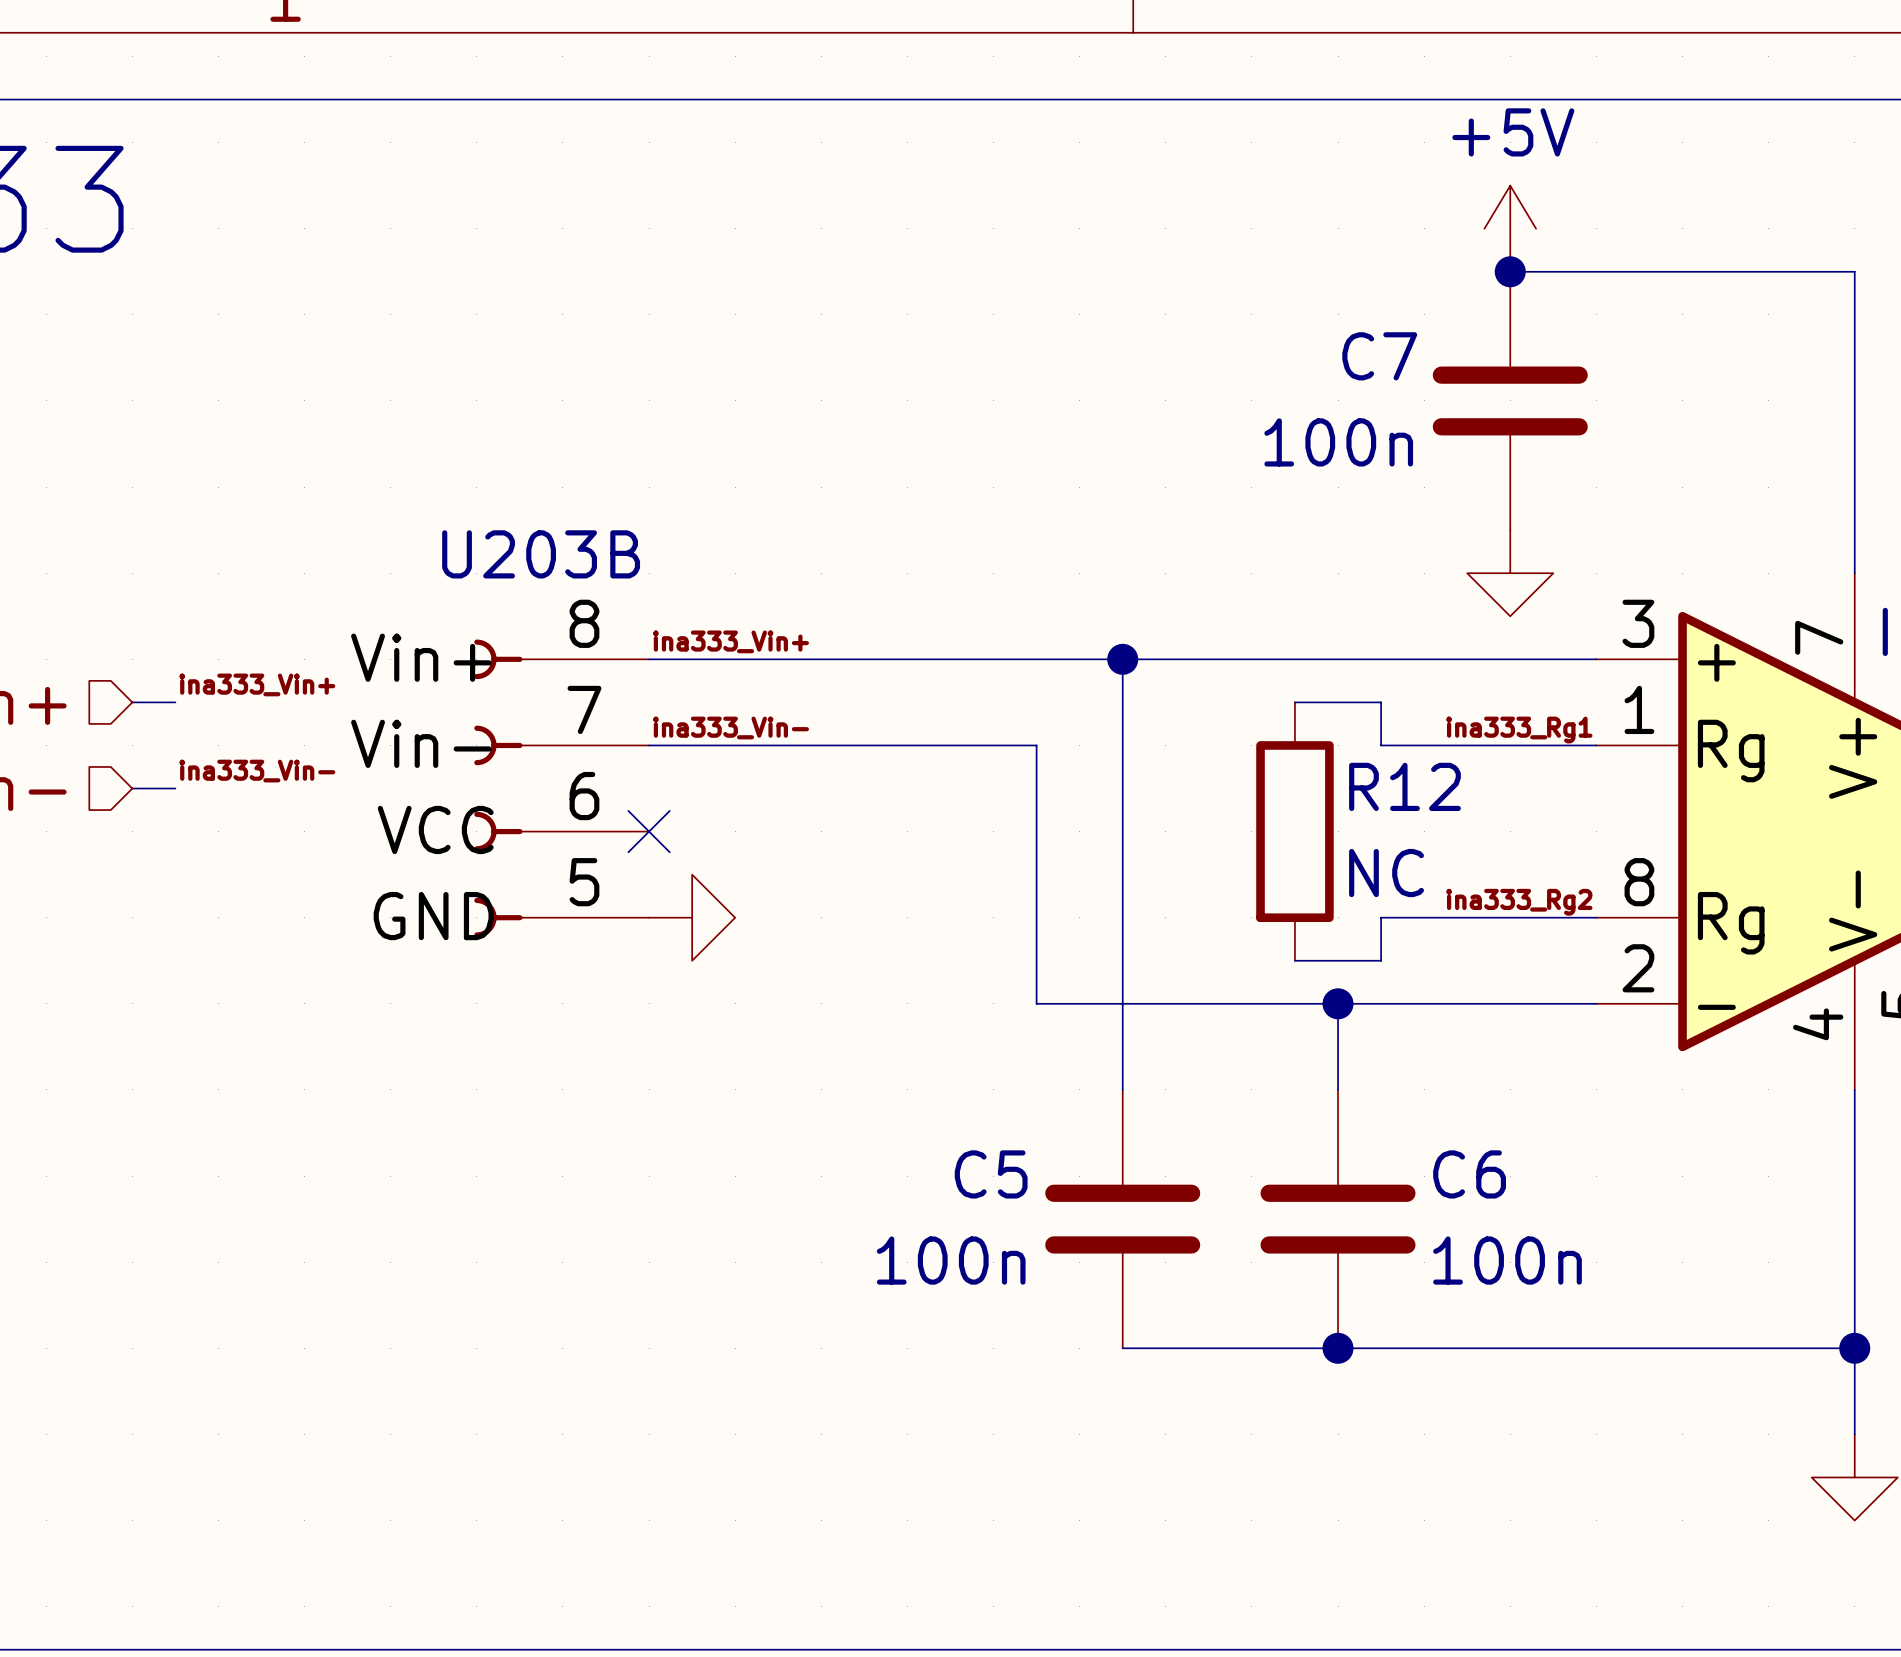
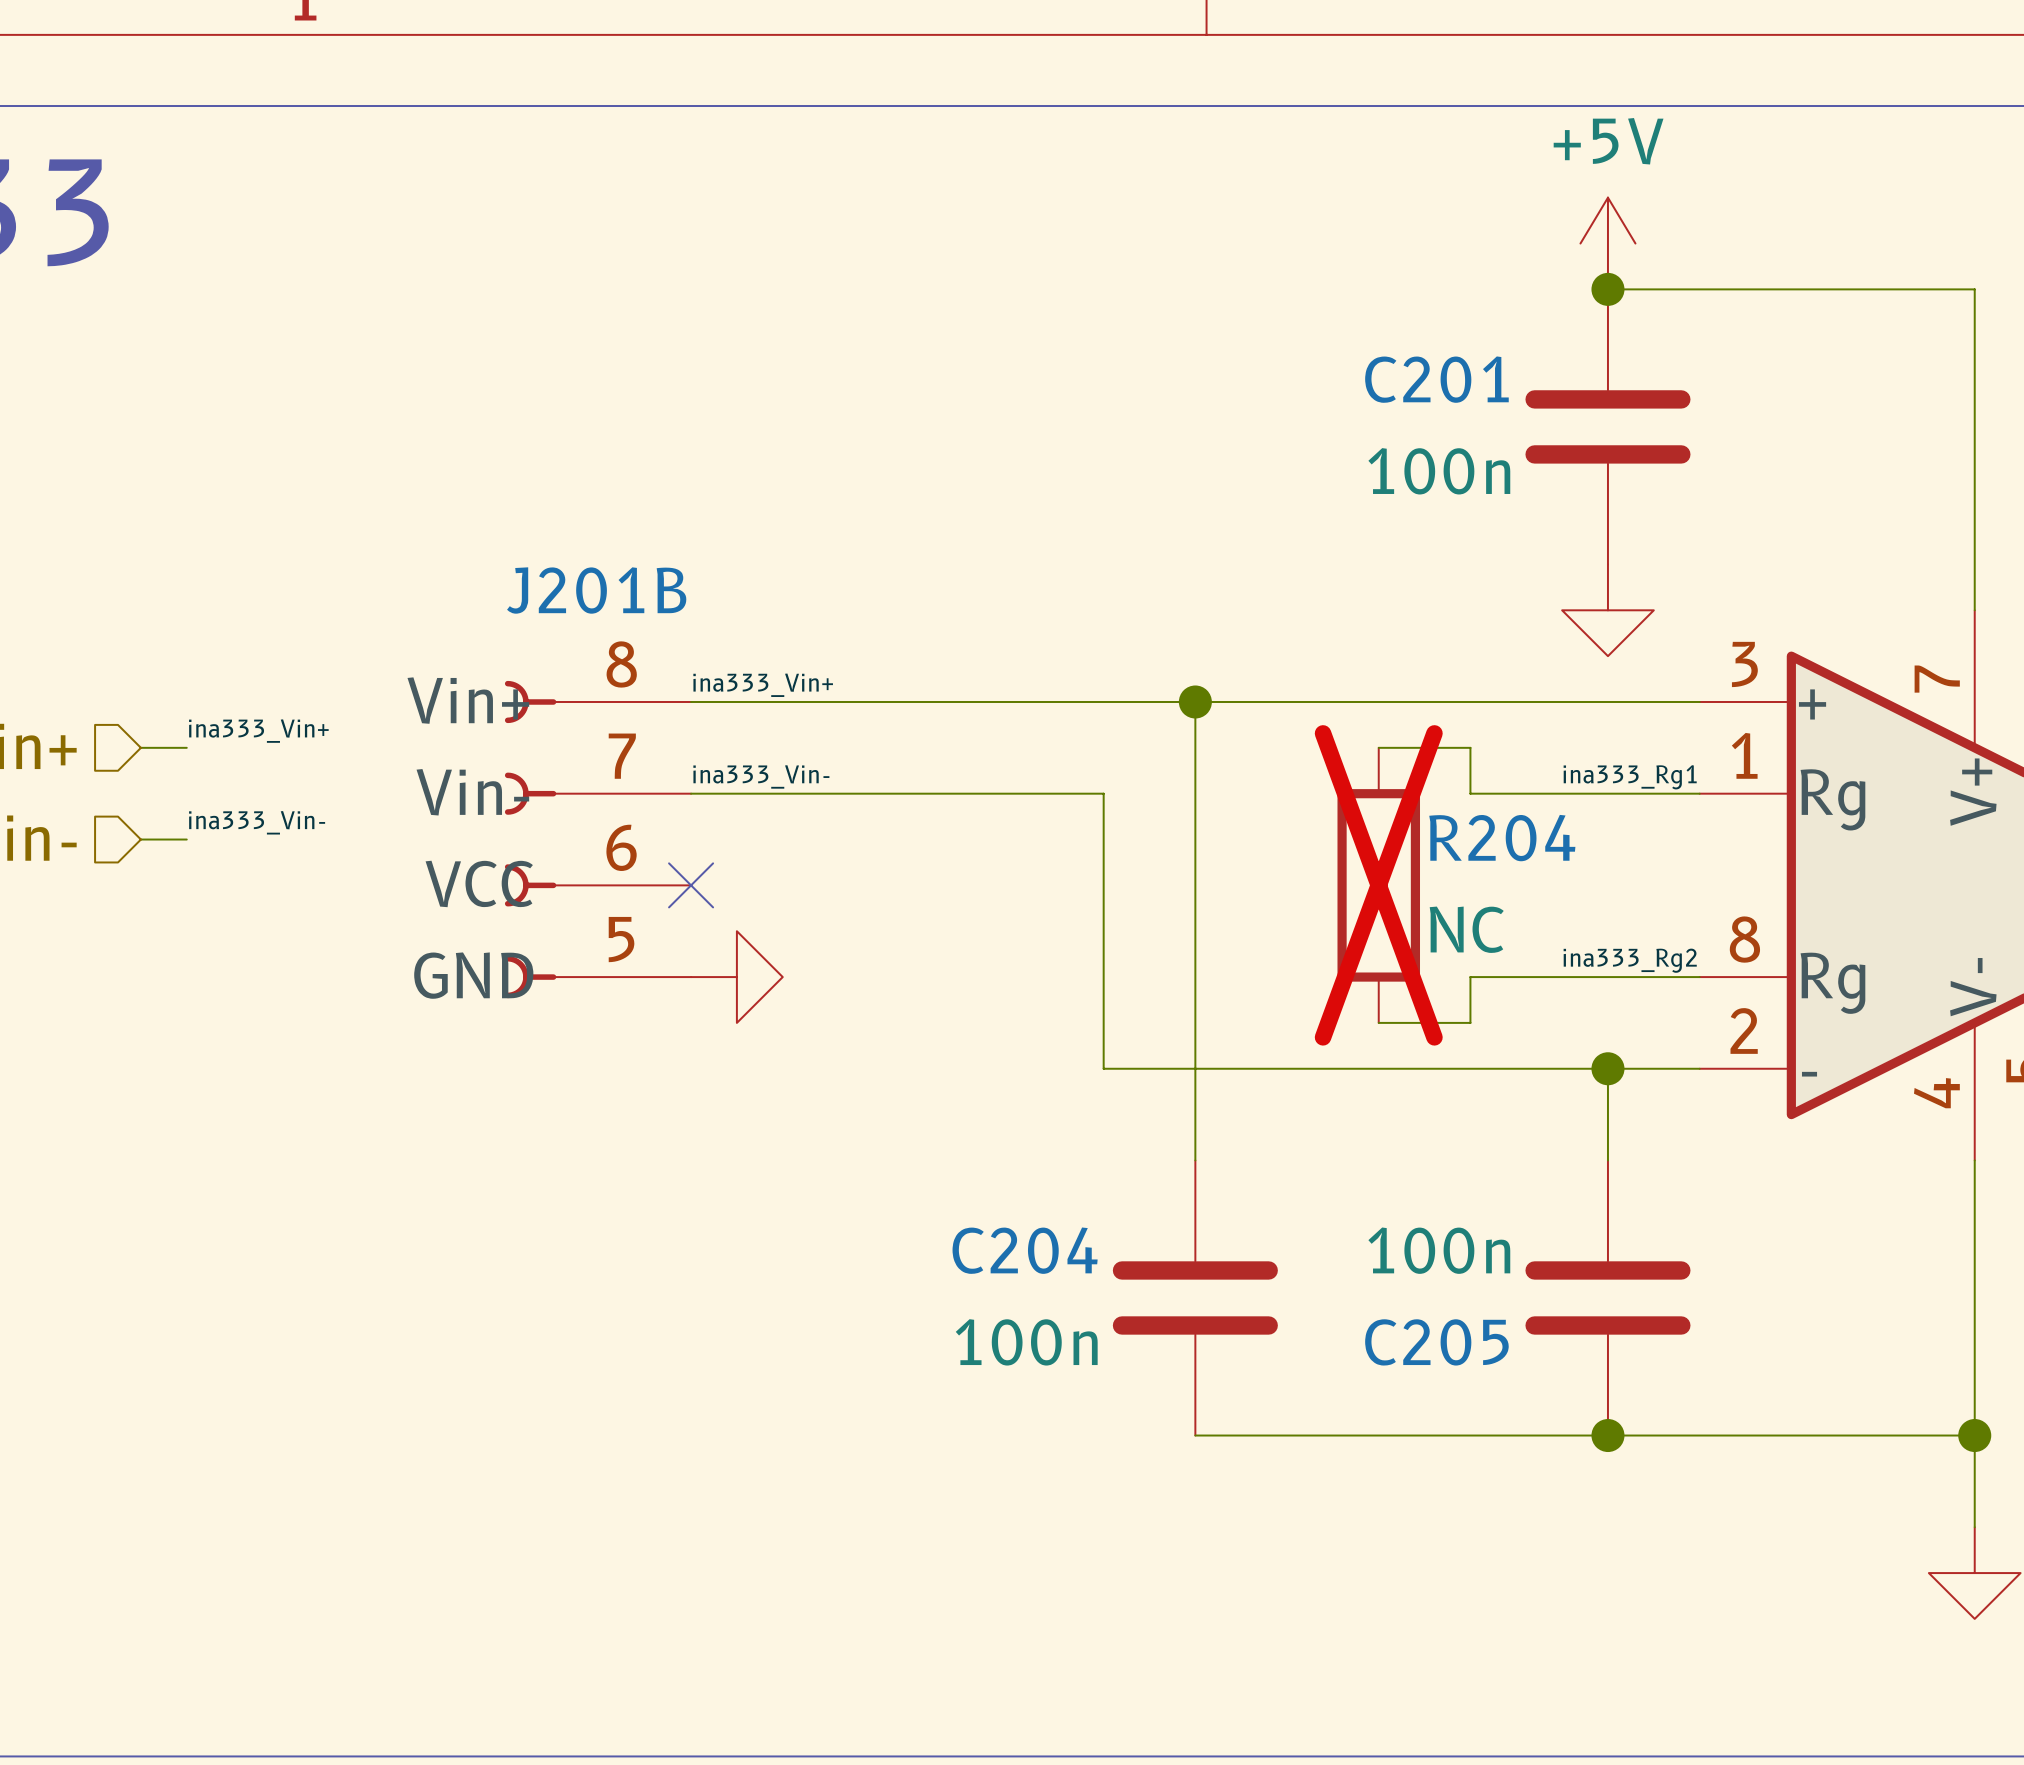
C7 name: C7 (1379, 356) -> C201 (1436, 379)
U203B name: U203B (541, 554) -> J201B (596, 590)
R12 name: R12 (1404, 786) -> R204 (1502, 838)
R12 do-not-place cross: none -> (1378, 885)
wire: (1338, 1003) (1338, 1089) -> (1607, 1068) (1607, 1160)
junction position: (1338, 1003) -> (1607, 1068)
C5 name: C5 (991, 1174) -> C204 (1025, 1250)
C6: 100n (1338, 1219) -> none
C205: none -> 100n (1607, 1297)
junction position: (1338, 1348) -> (1607, 1435)

